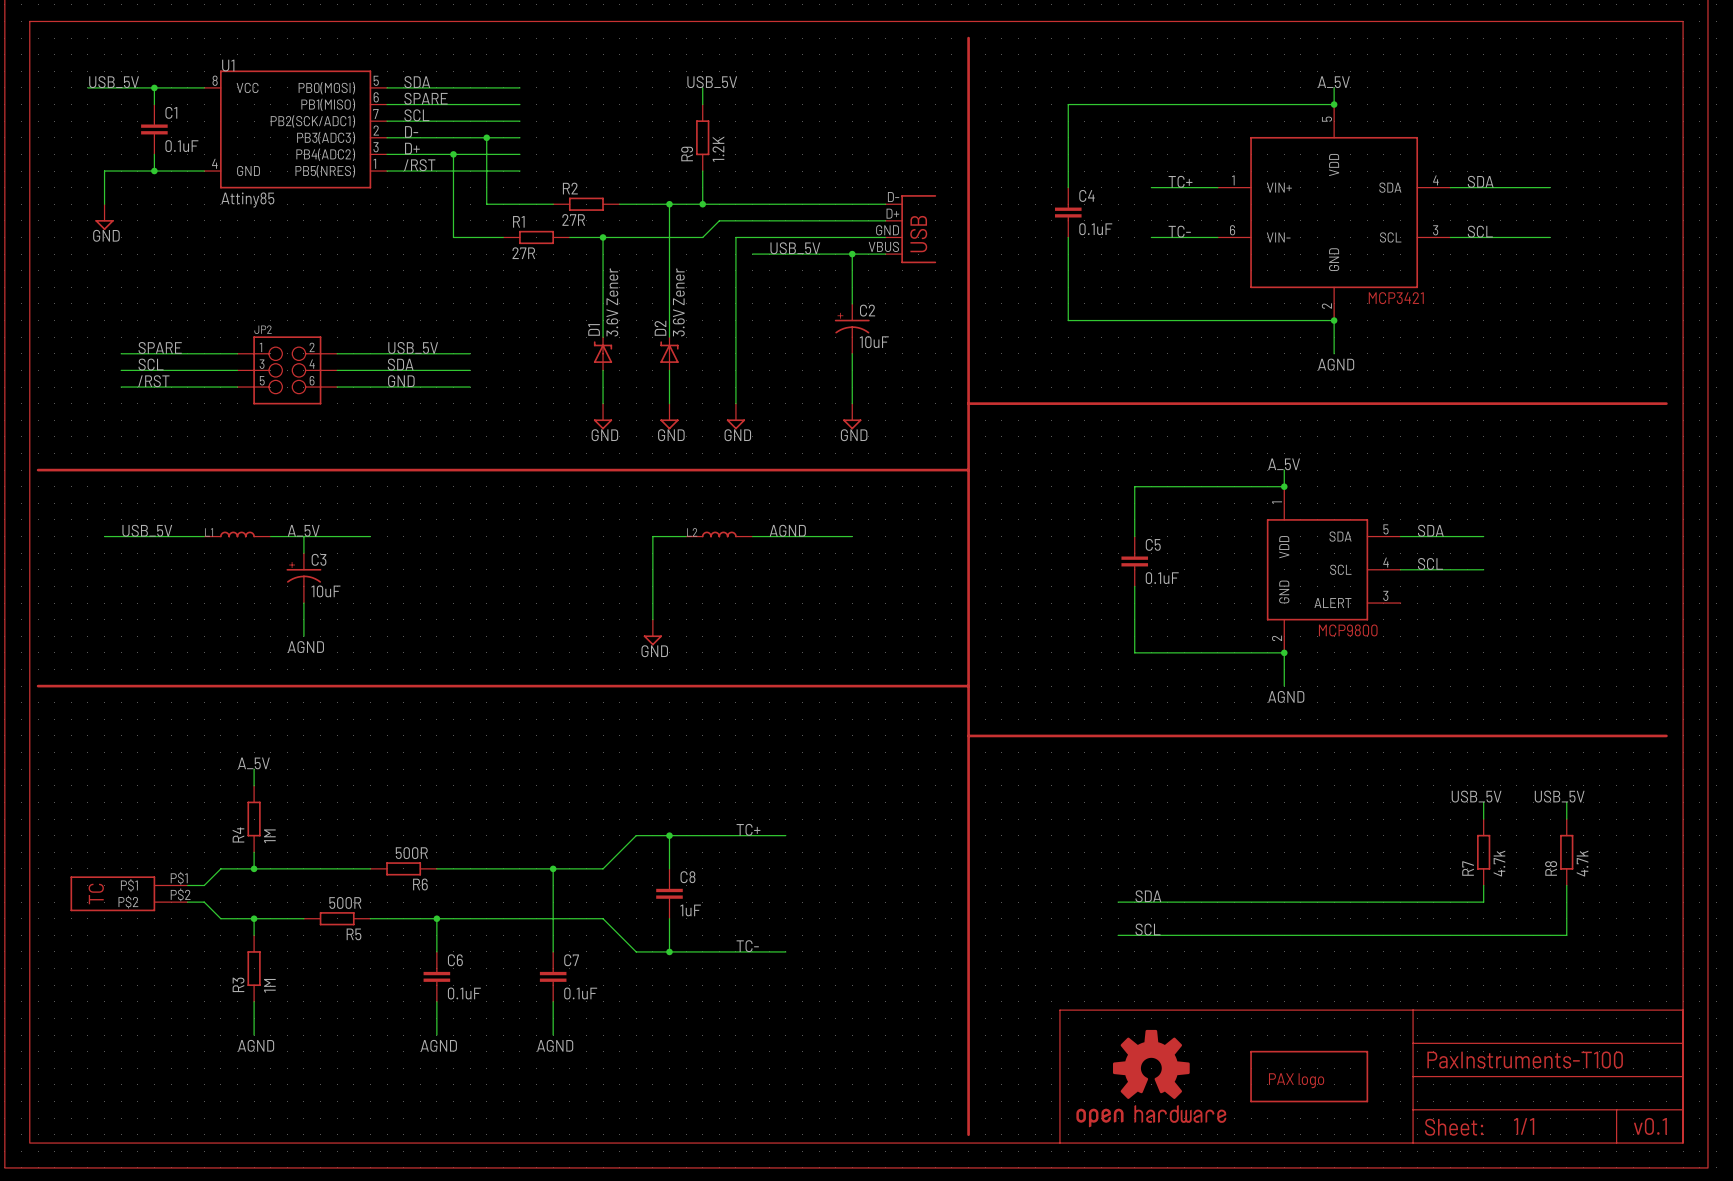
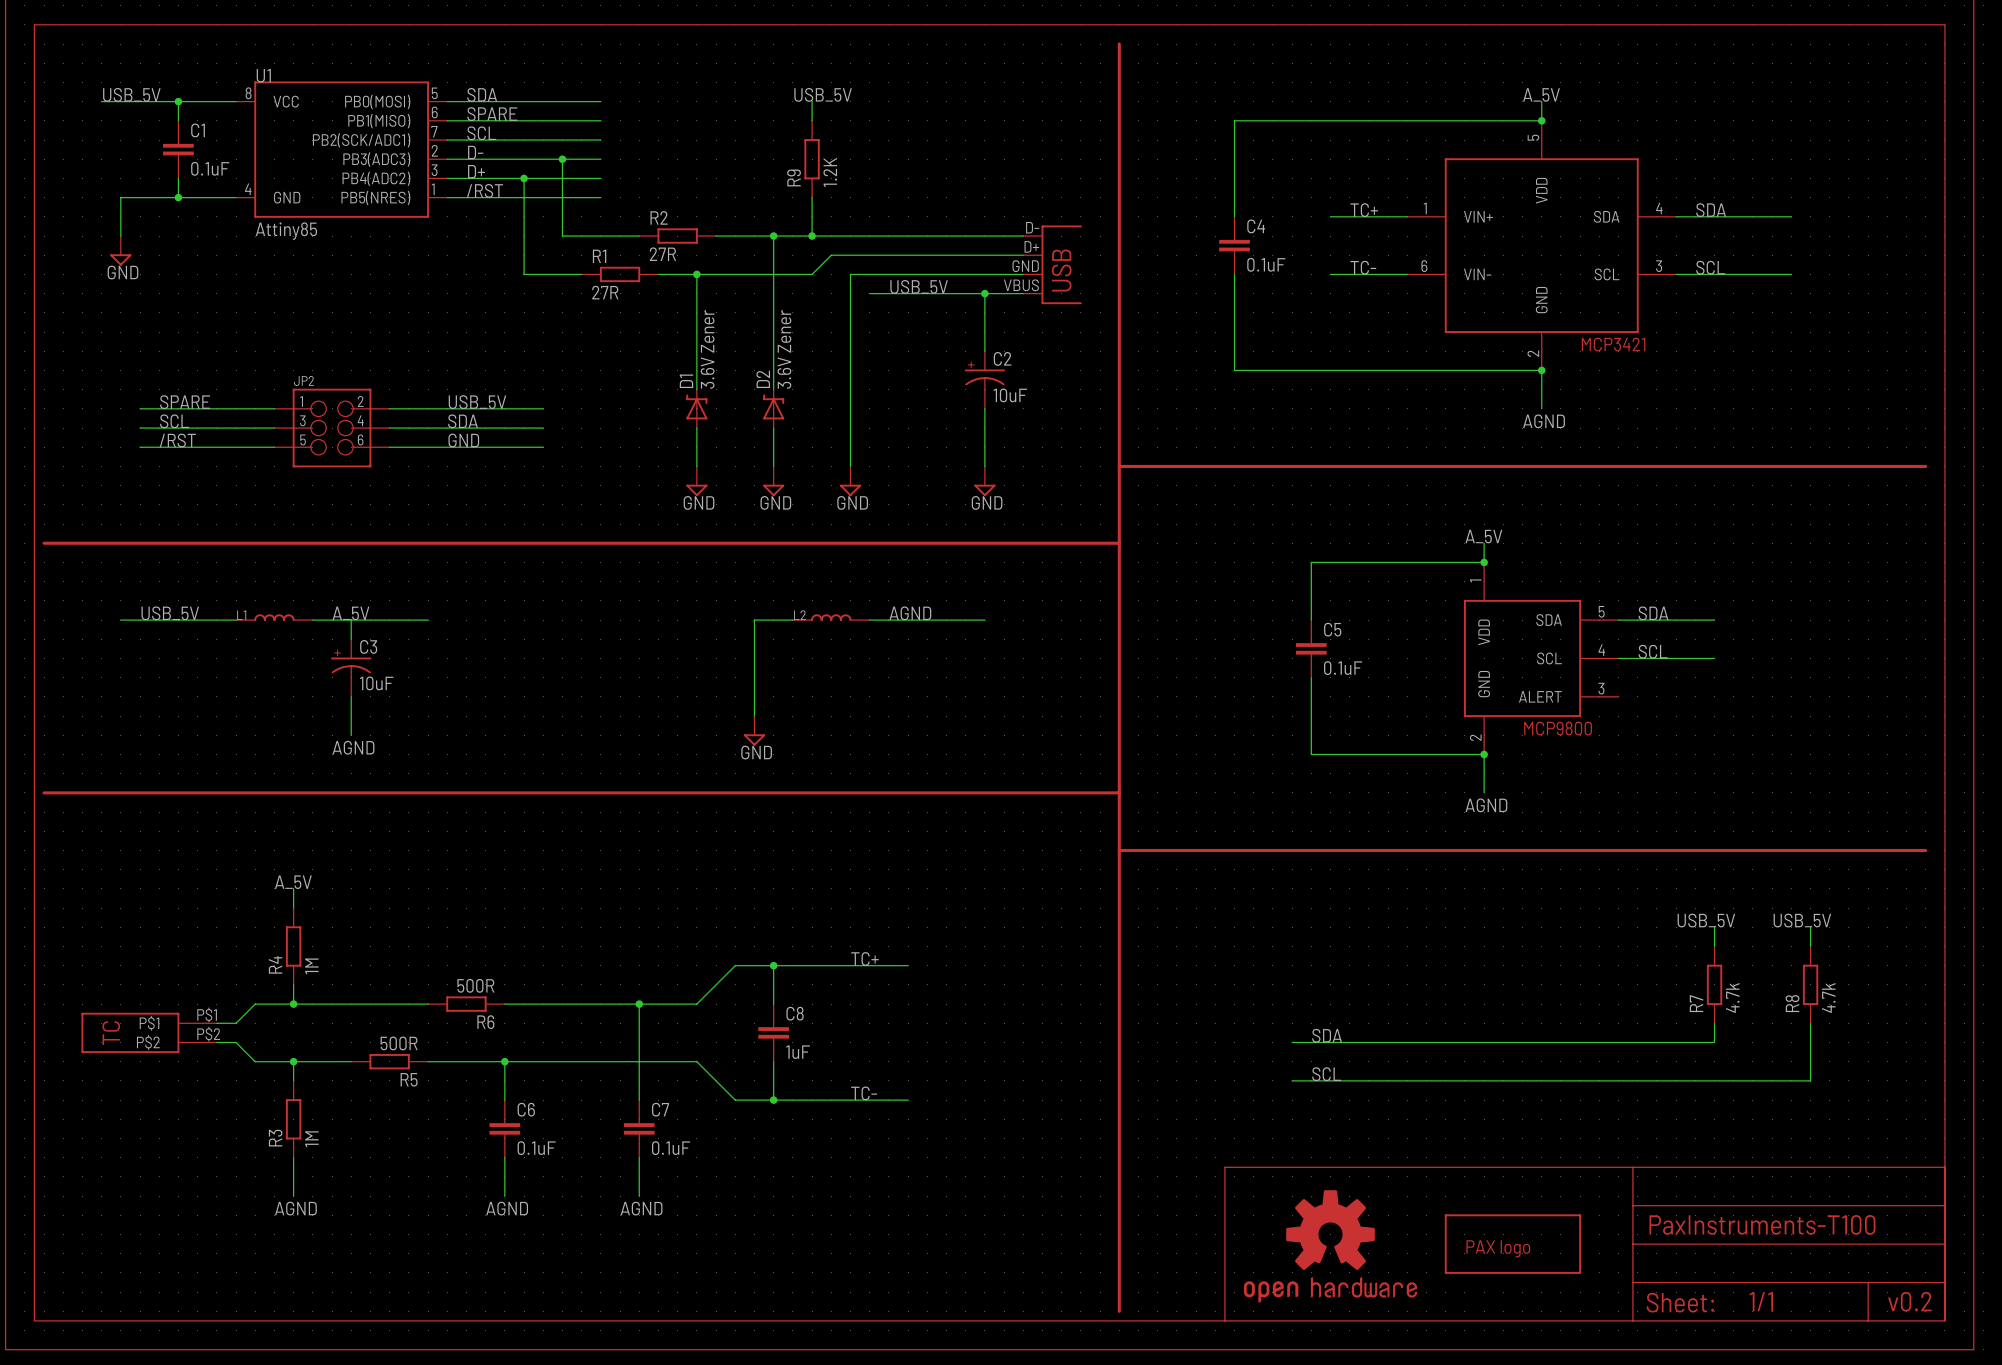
text: v0.1 (1650, 1126) -> v0.2 (1909, 1301)

